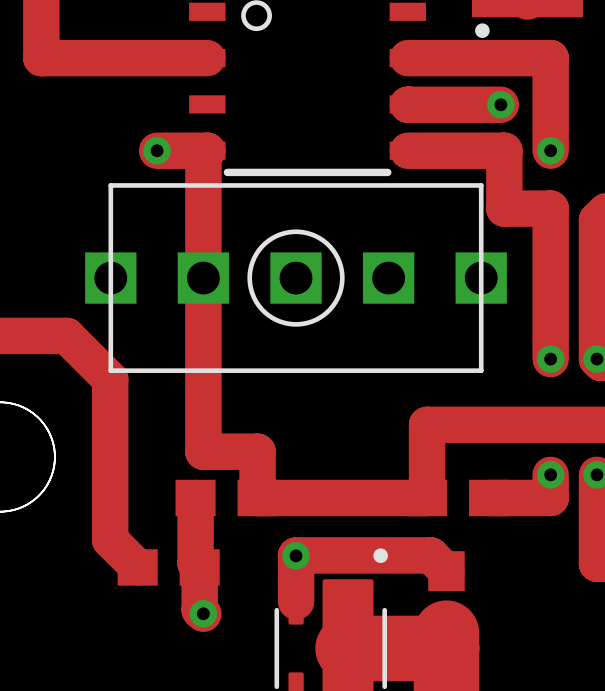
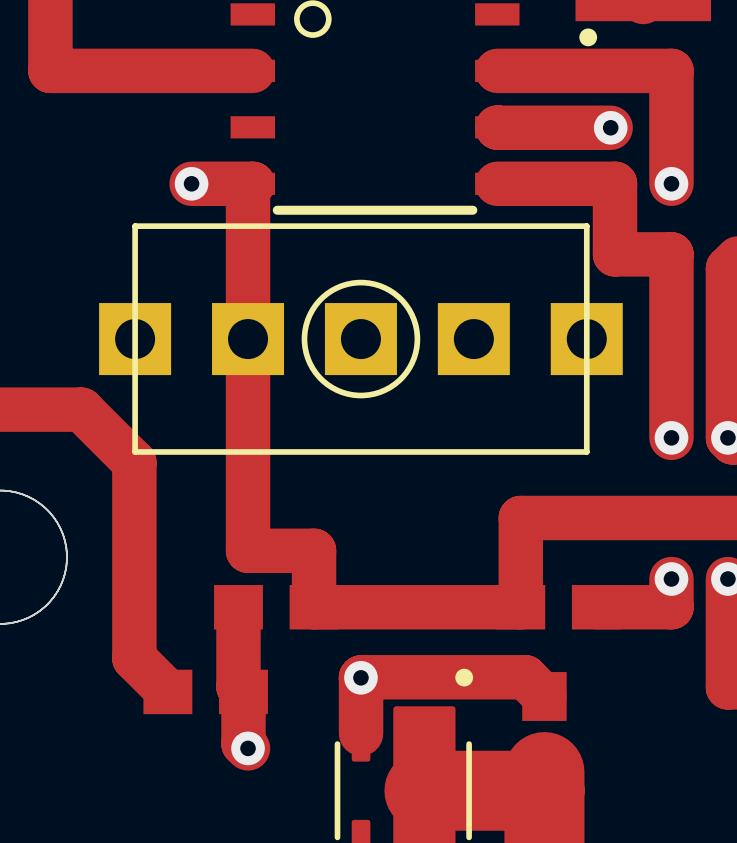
part footprint: [85, 183, 507, 373] -> [99, 223, 623, 455]

